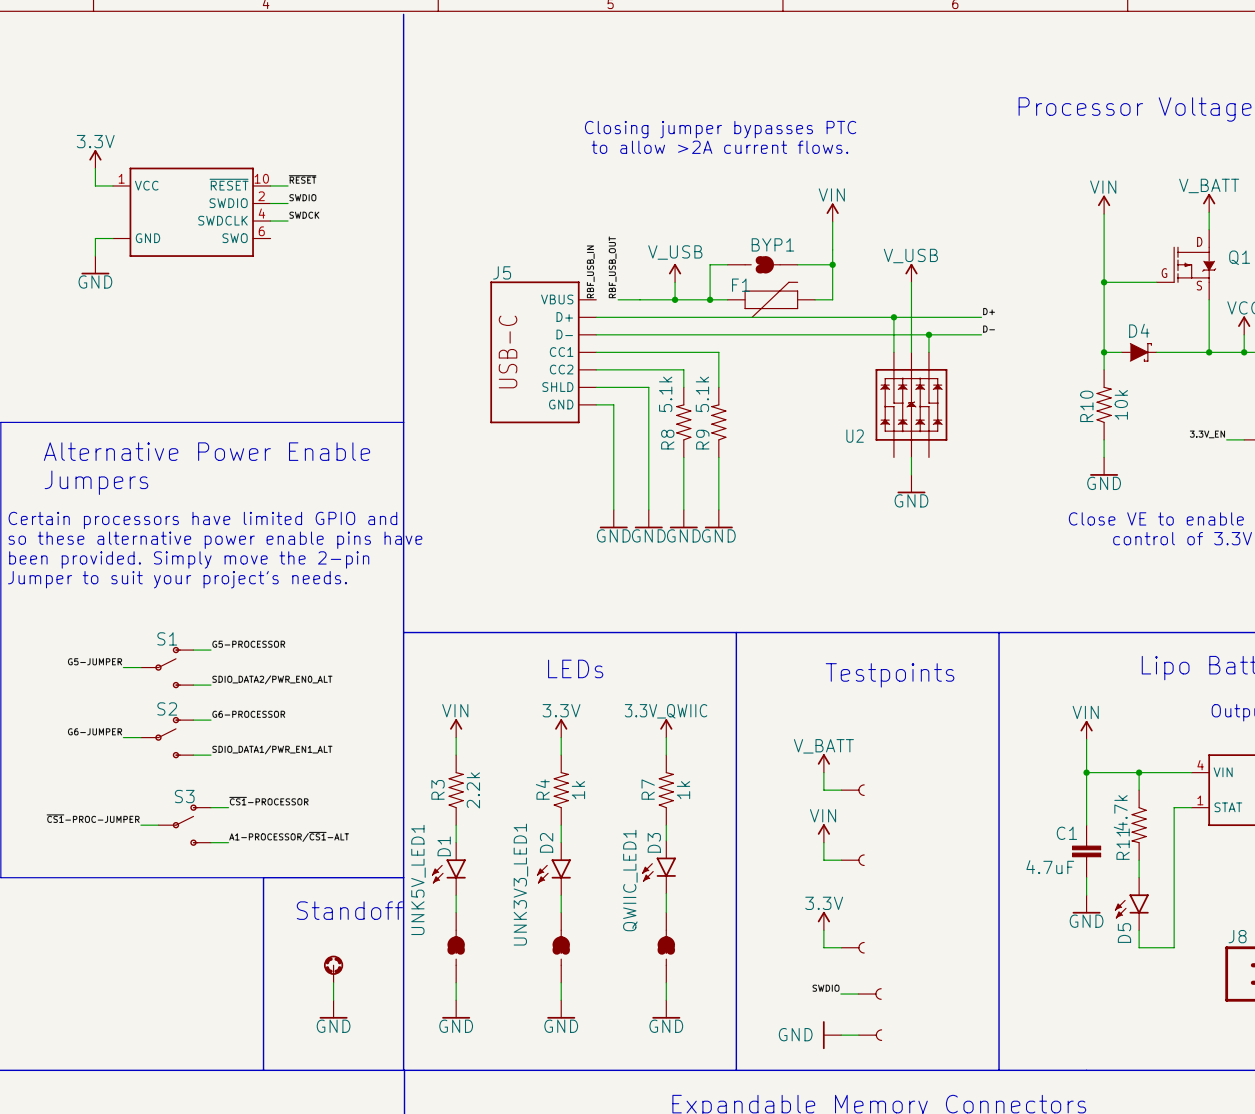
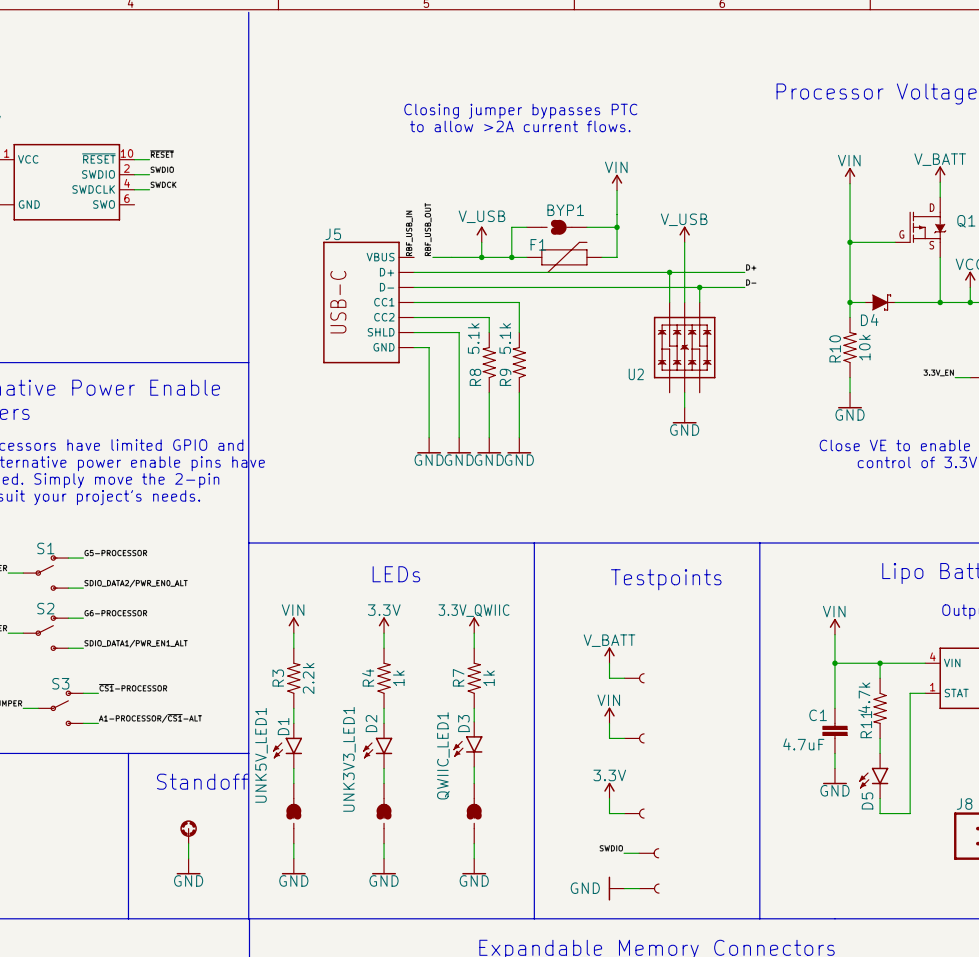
D4 name position: D4 (1139, 330) -> D4 (869, 320)

